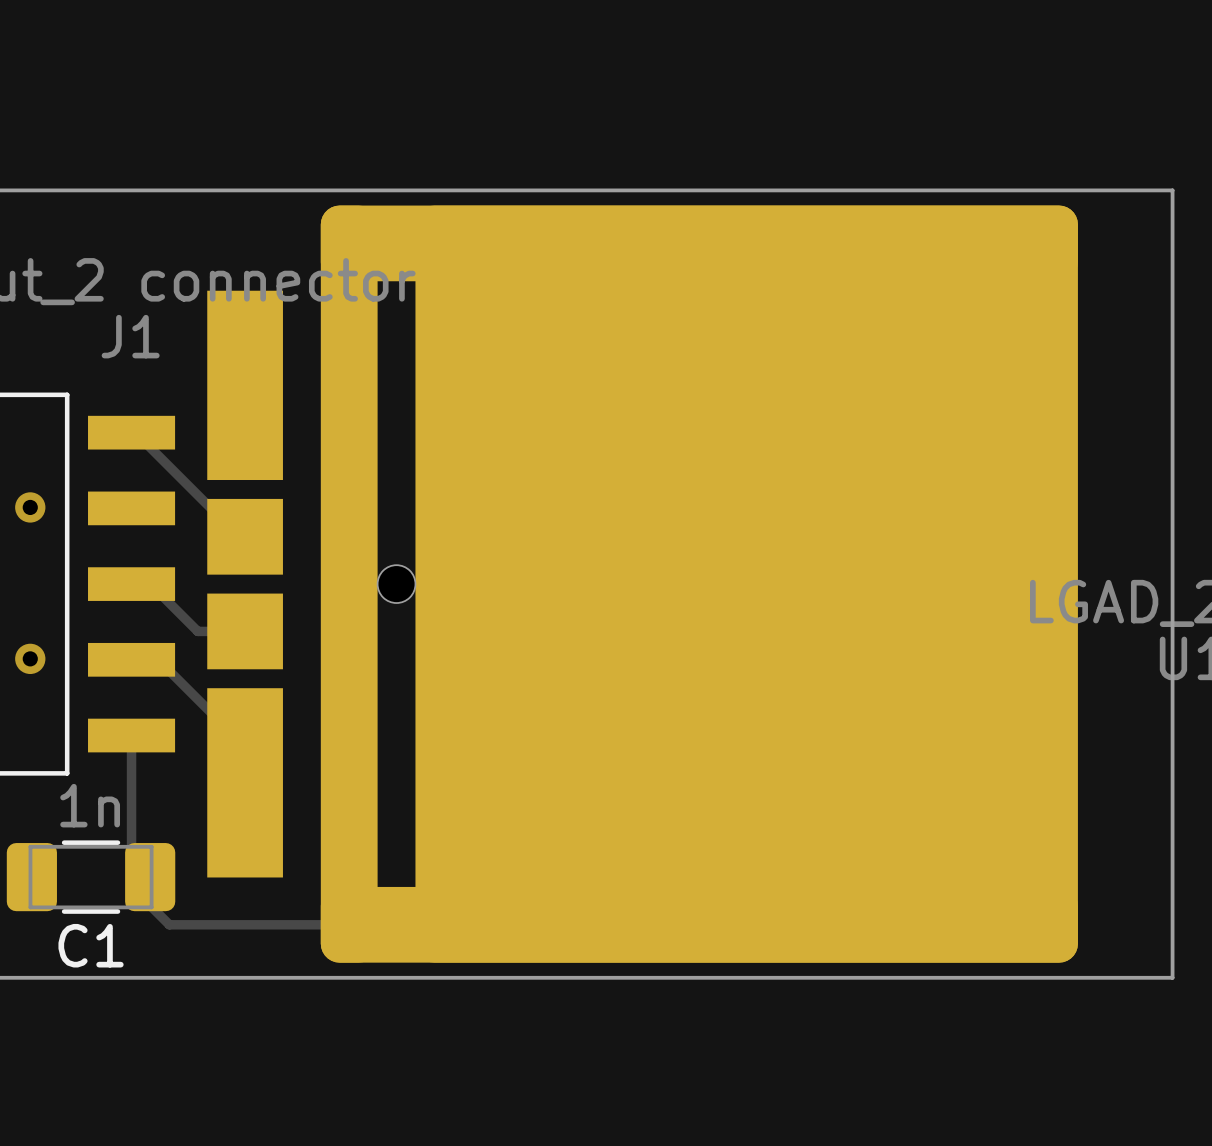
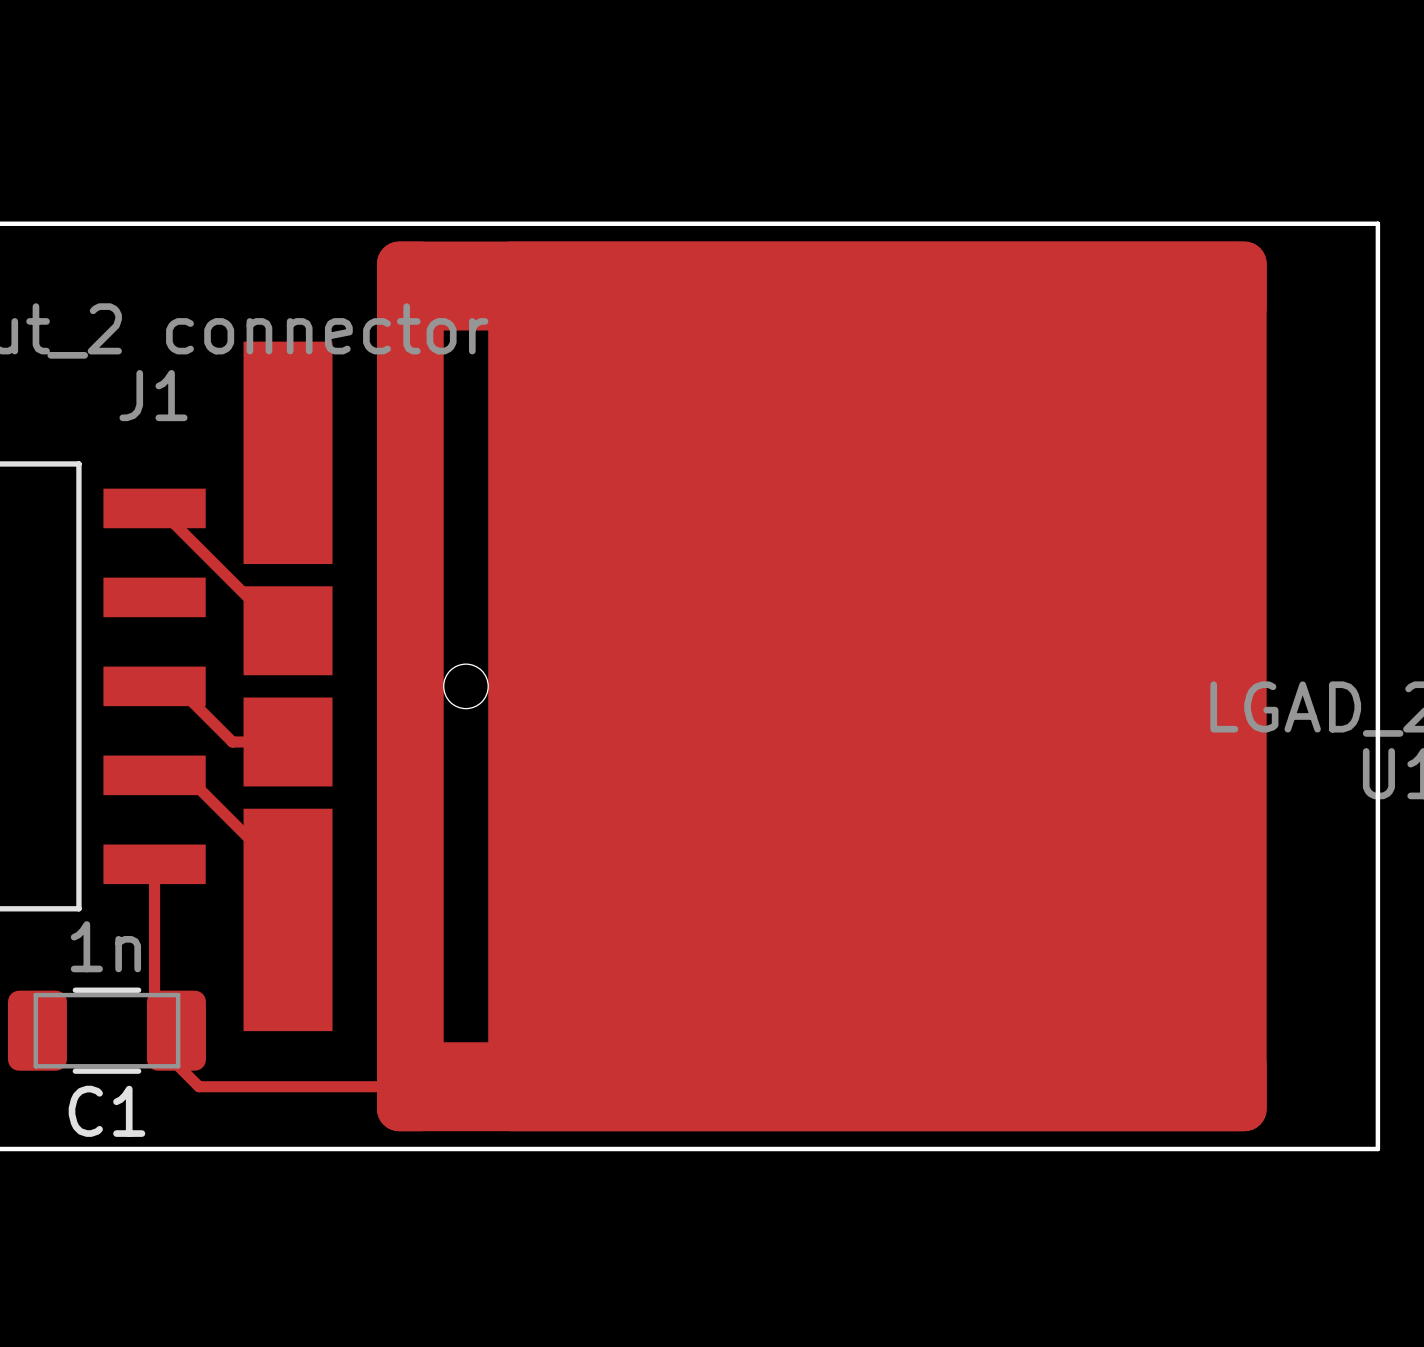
via: (30, 507) -> none
via: (30, 658) -> none

